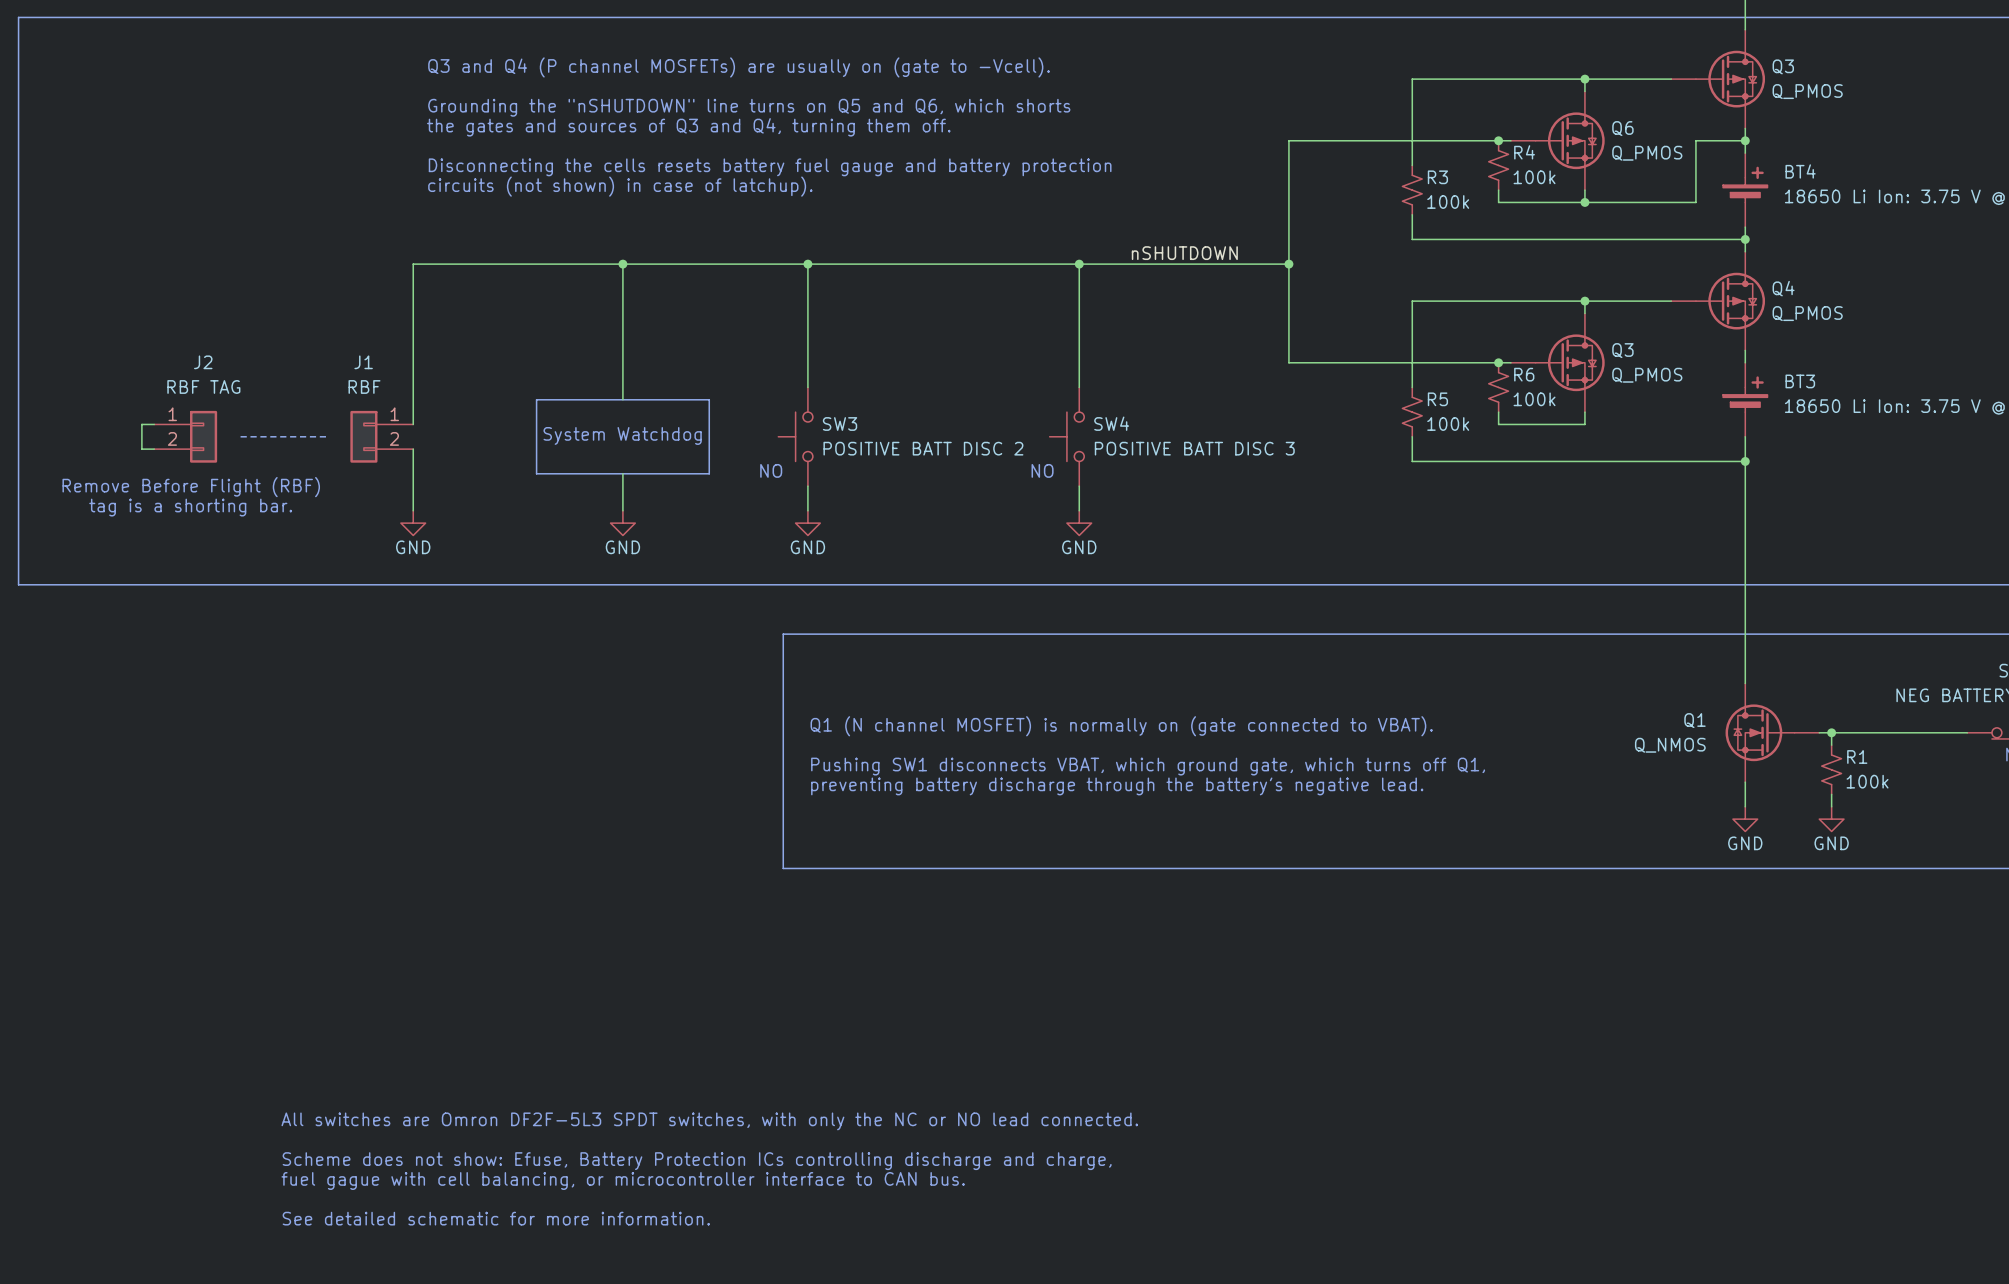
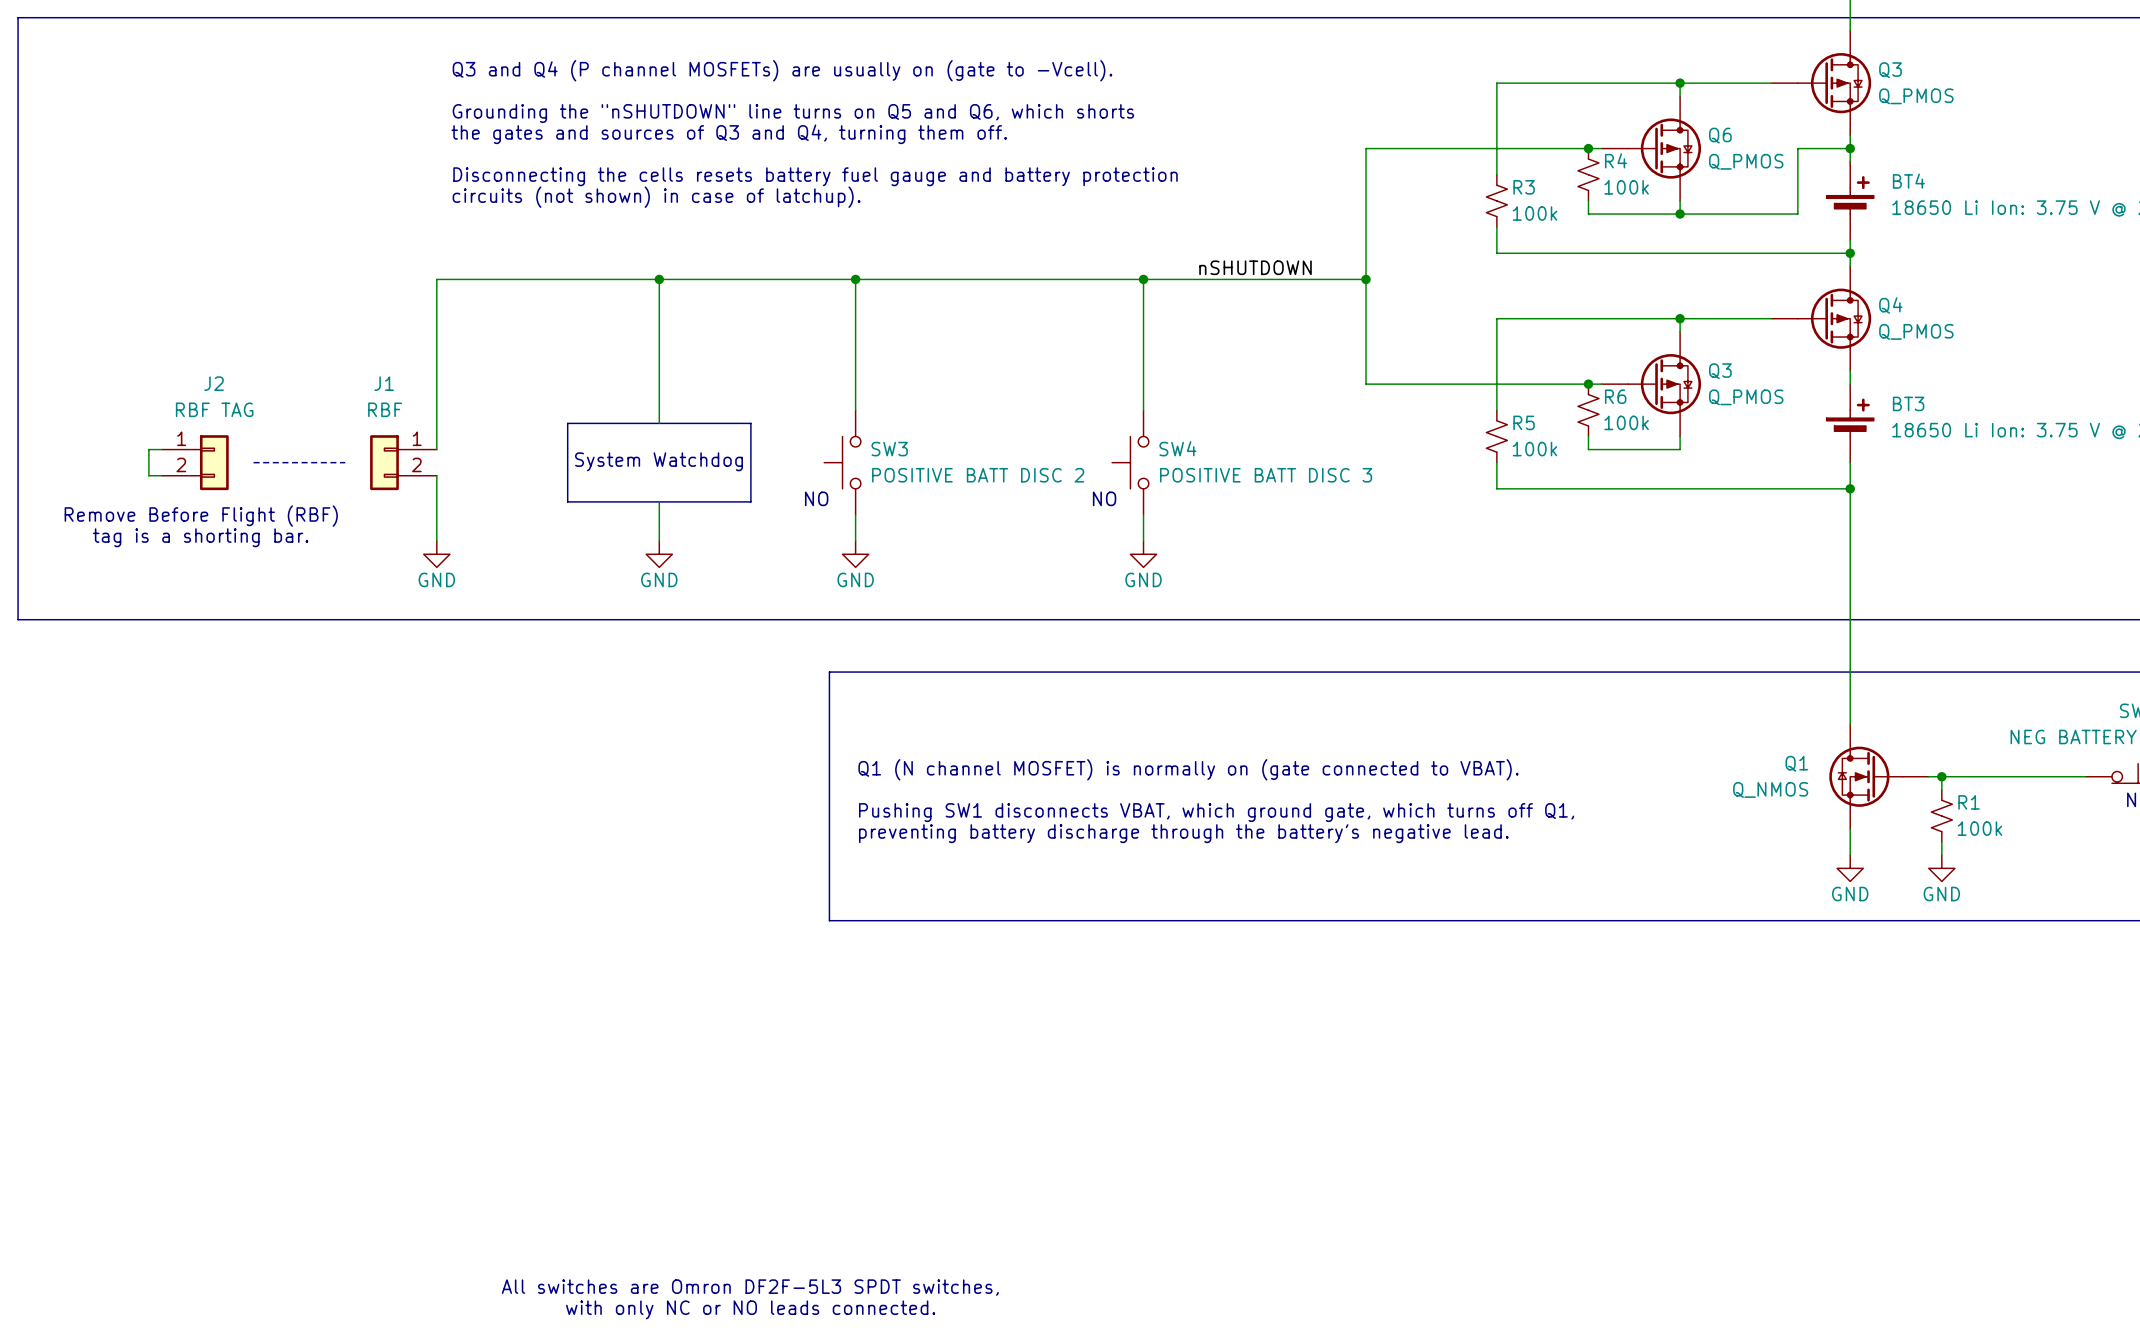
text: All switches are Omron DF2F-5L3 SPDT switches, with only the NC or NO lead connected. (709, 1121) -> none
text: Scheme does not show: Efuse, Battery Protection ICs controlling discharge and charge, (697, 1161) -> none
text: fuel gague with cell balancing, or microcontroller interface to CAN bus. (623, 1180) -> none
text: none -> All switches are Omron DF2F-5L3 SPDT switches, (750, 1287)
text: See detailed schematic for more information. (496, 1218) -> none
text: none -> with only NC or NO leads connected. (750, 1309)

